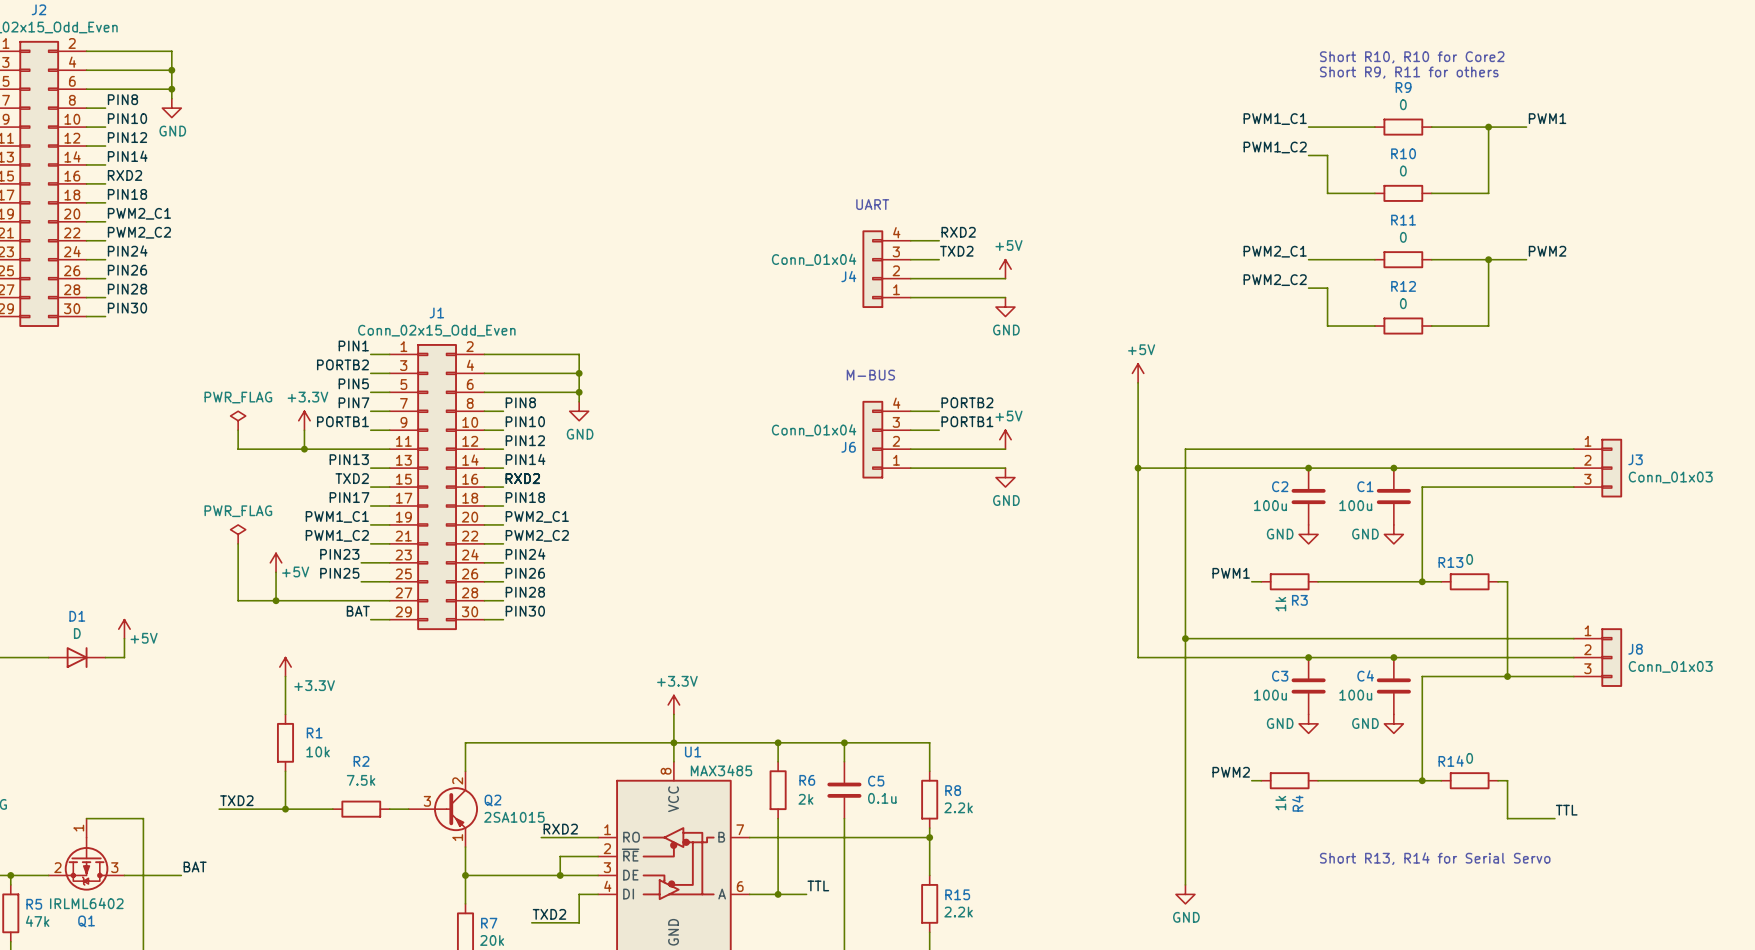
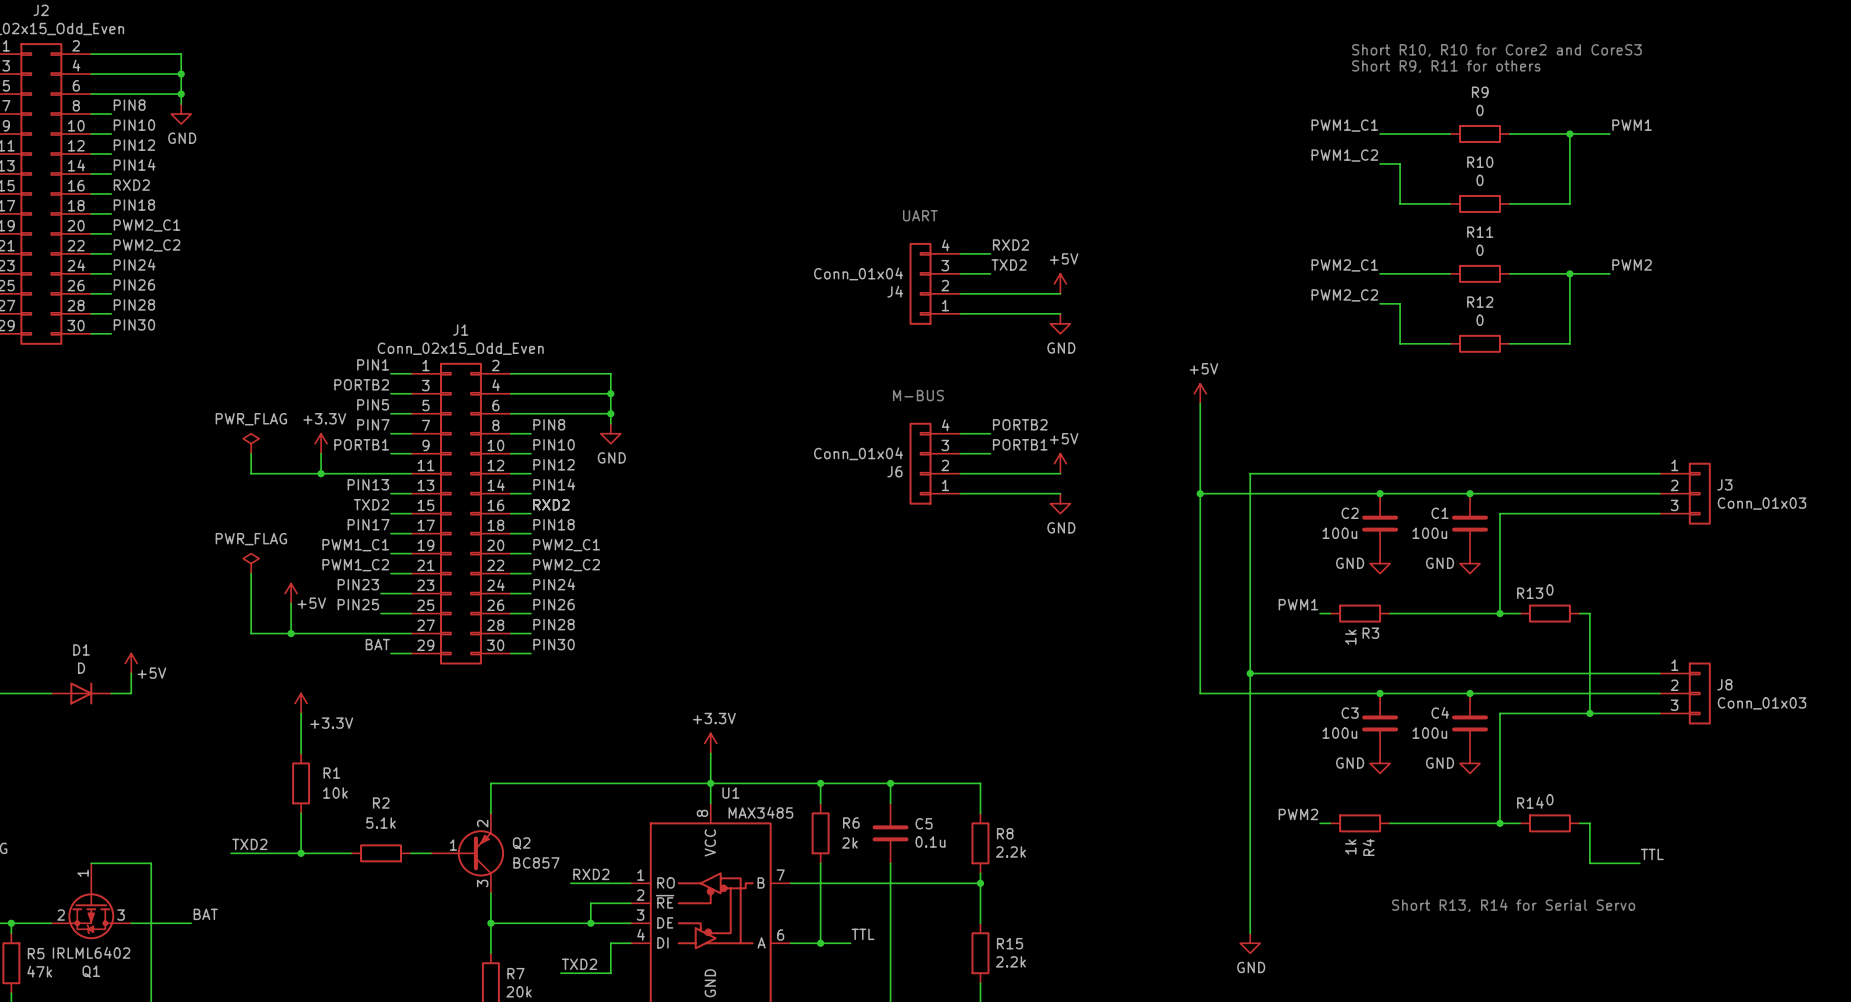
text: Short R10, R10 for Core2 (1412, 57) -> Short R10, R10 for Core2 and CoreS3 (1496, 50)
text position: Short R9, R11 for others (1409, 72) -> Short R9, R11 for others (1446, 66)
Q2 symbol: [408, 771, 479, 848] -> [430, 813, 505, 894]
R2 value: 7.5k (361, 780) -> 5.1k (381, 823)
Q2 value: 2SA1015 (514, 817) -> BC857 (536, 862)

